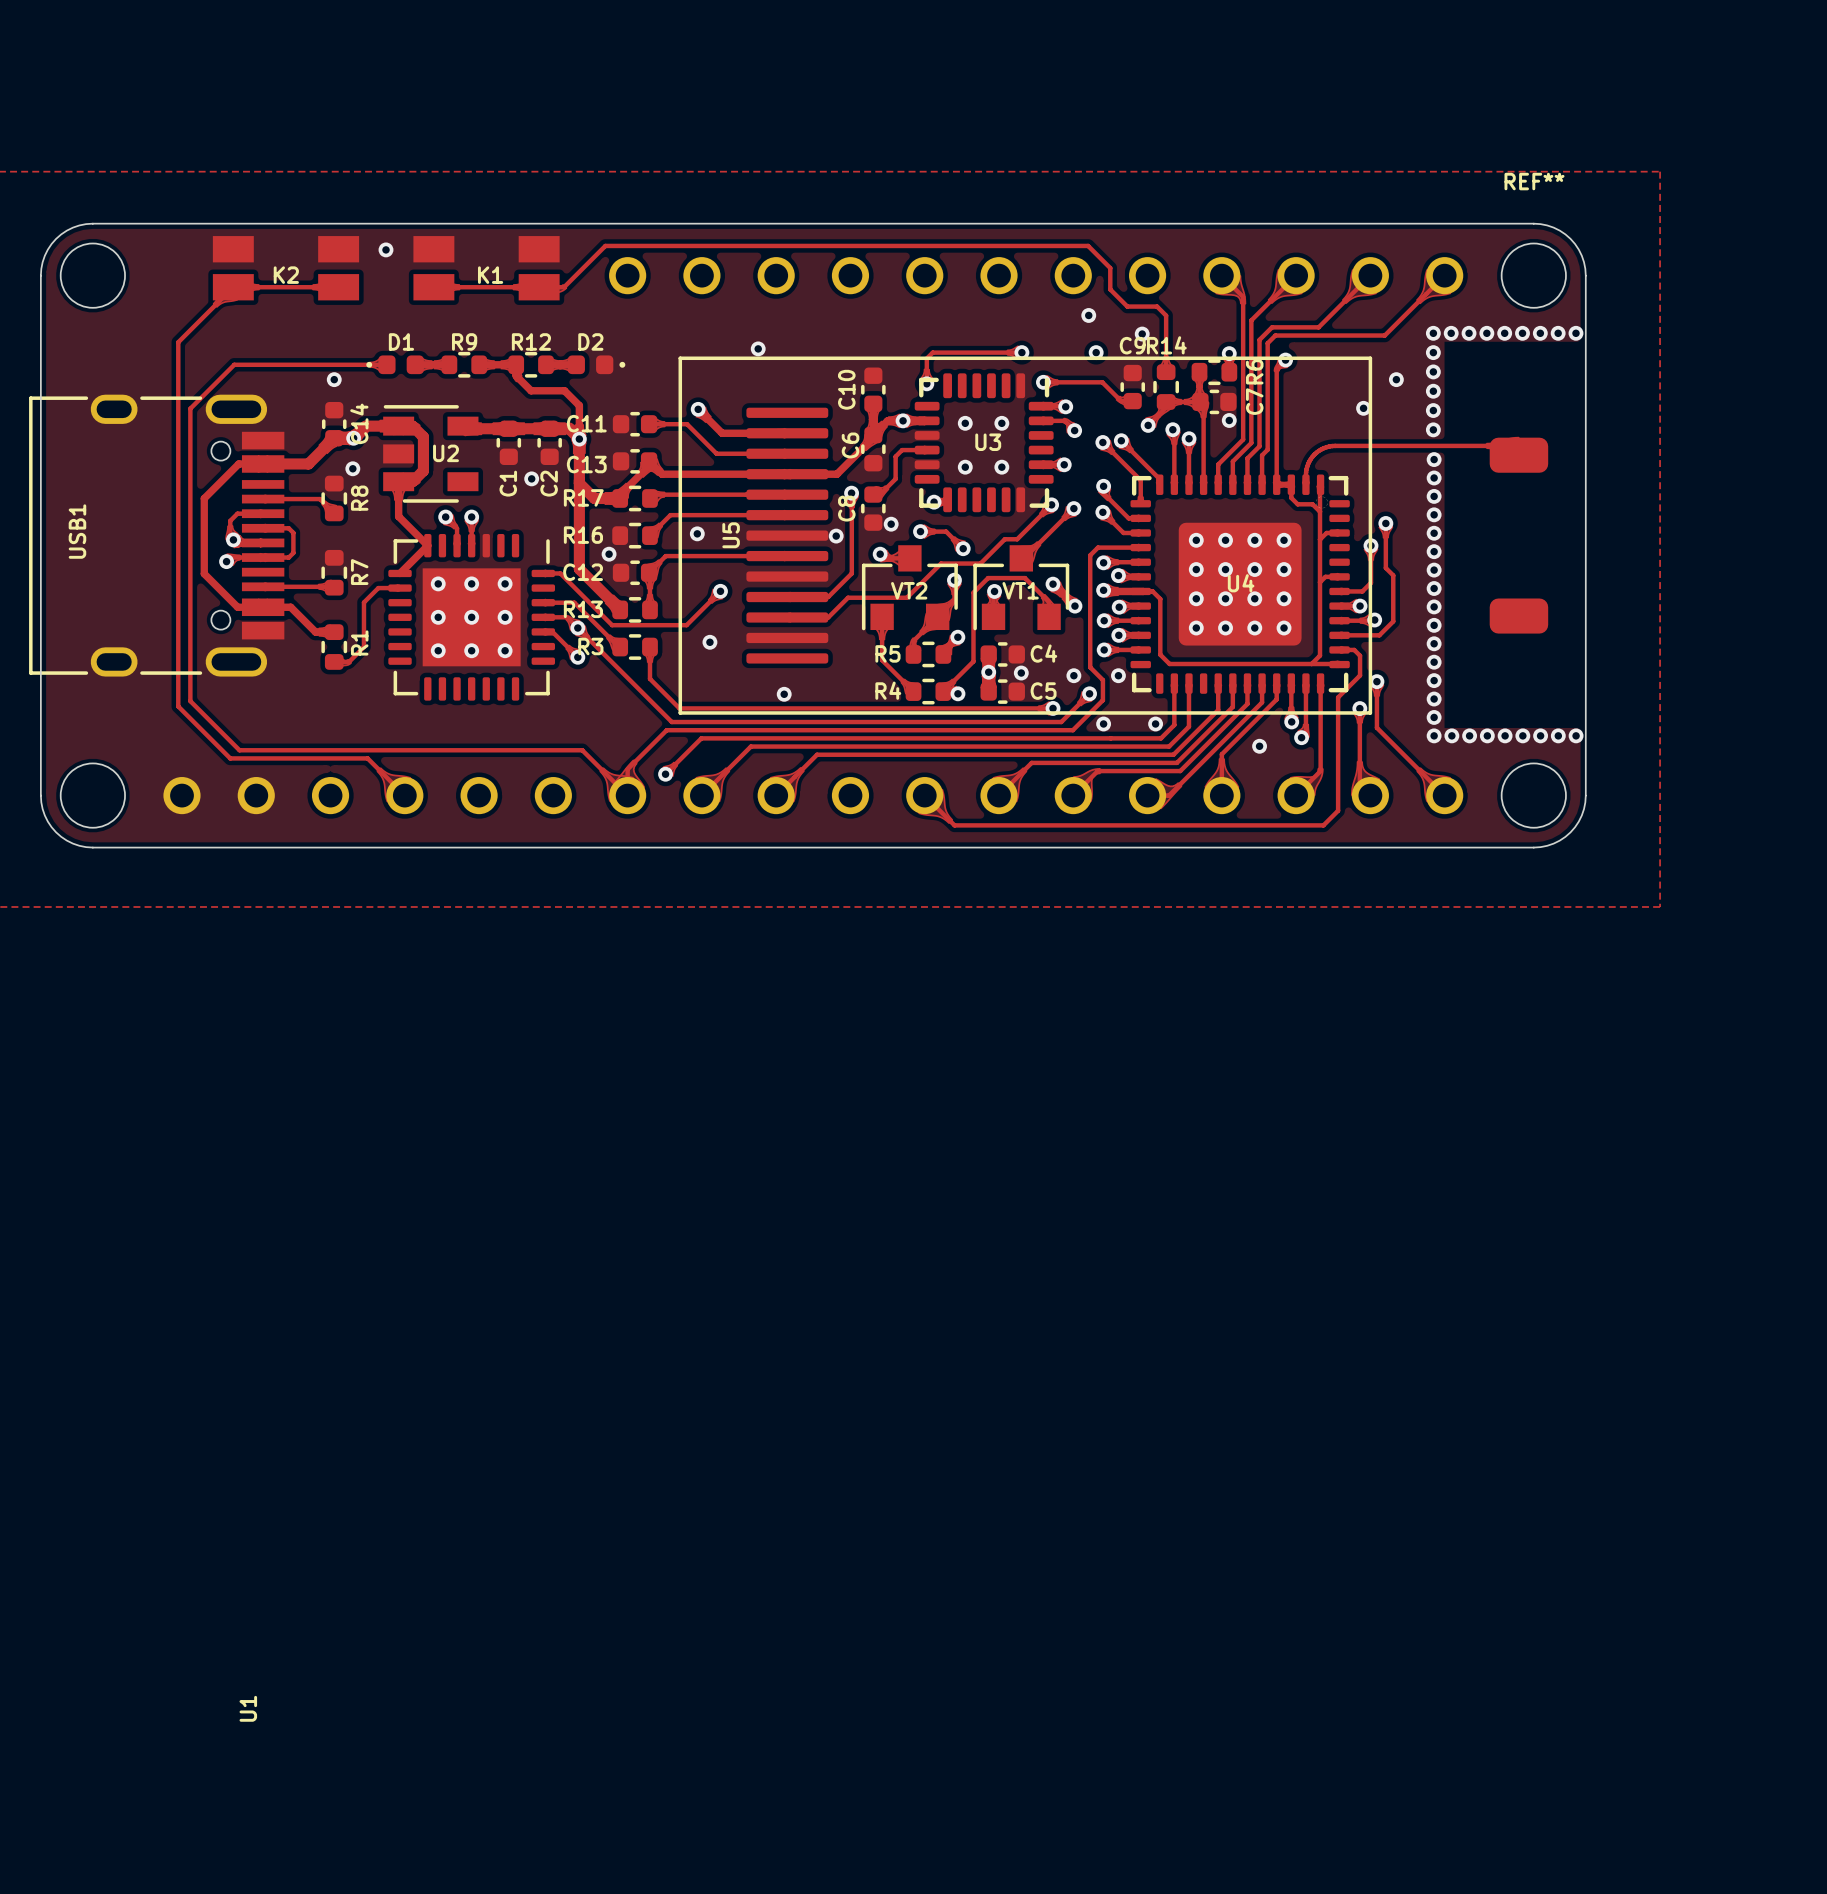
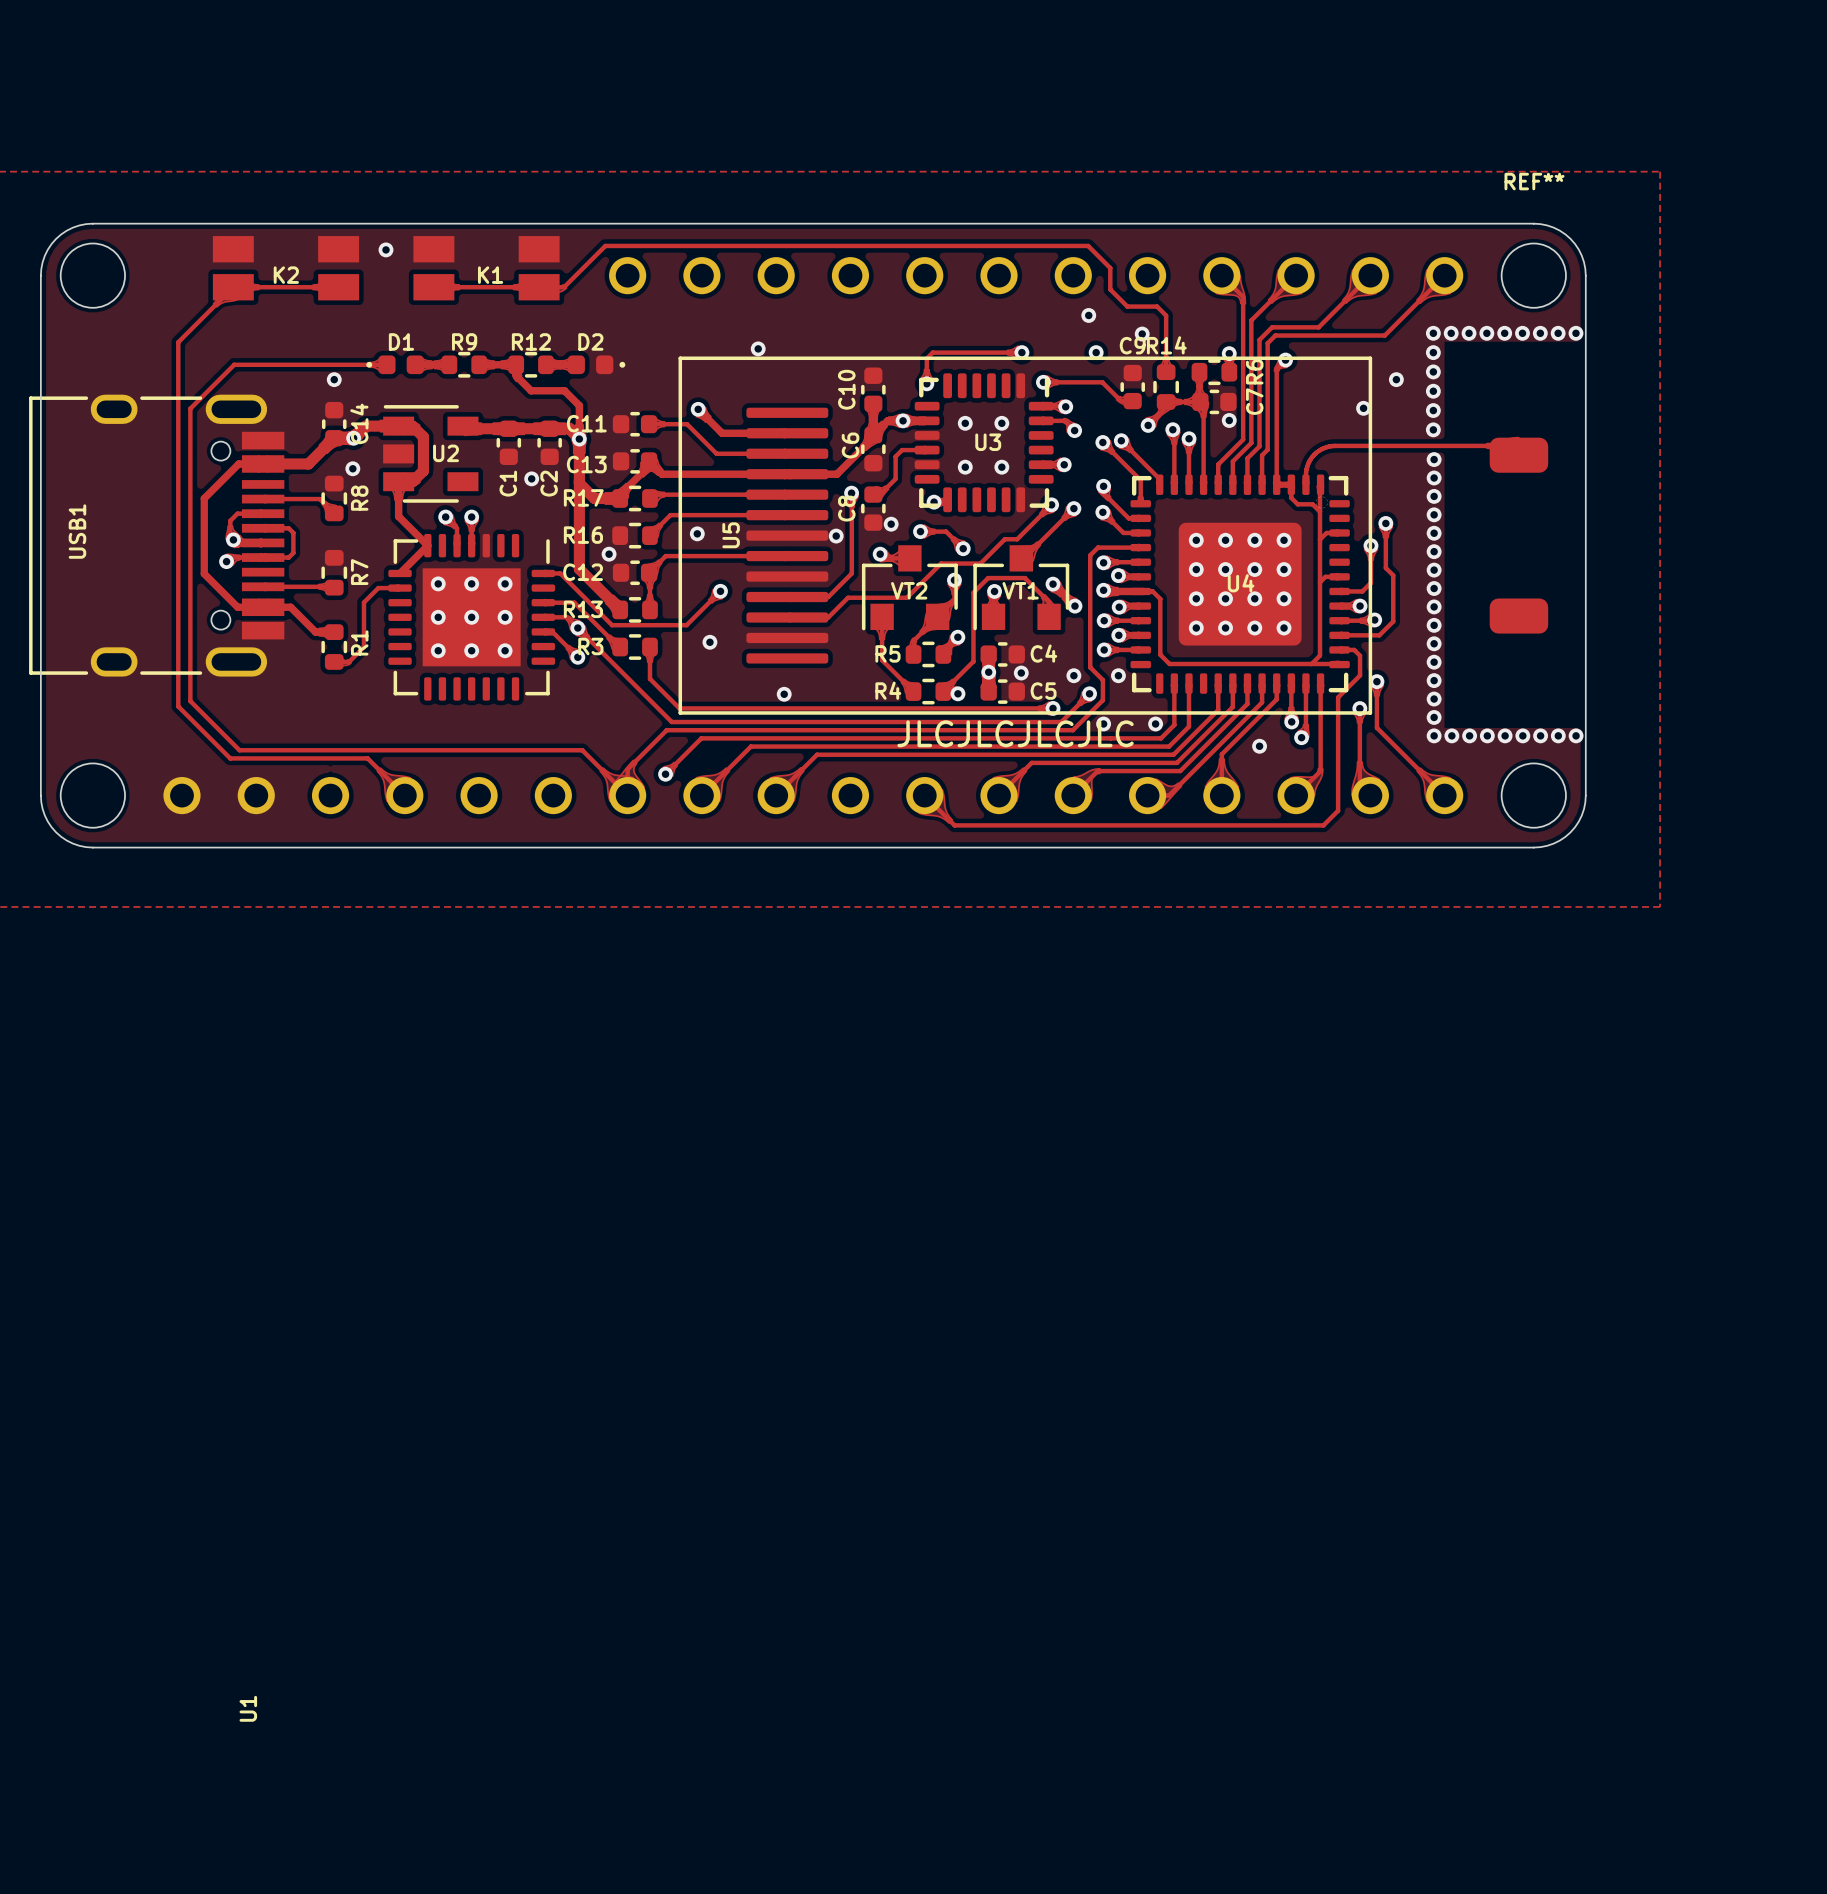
text: none -> JLCJLCJLCJLC (1015, 733)

